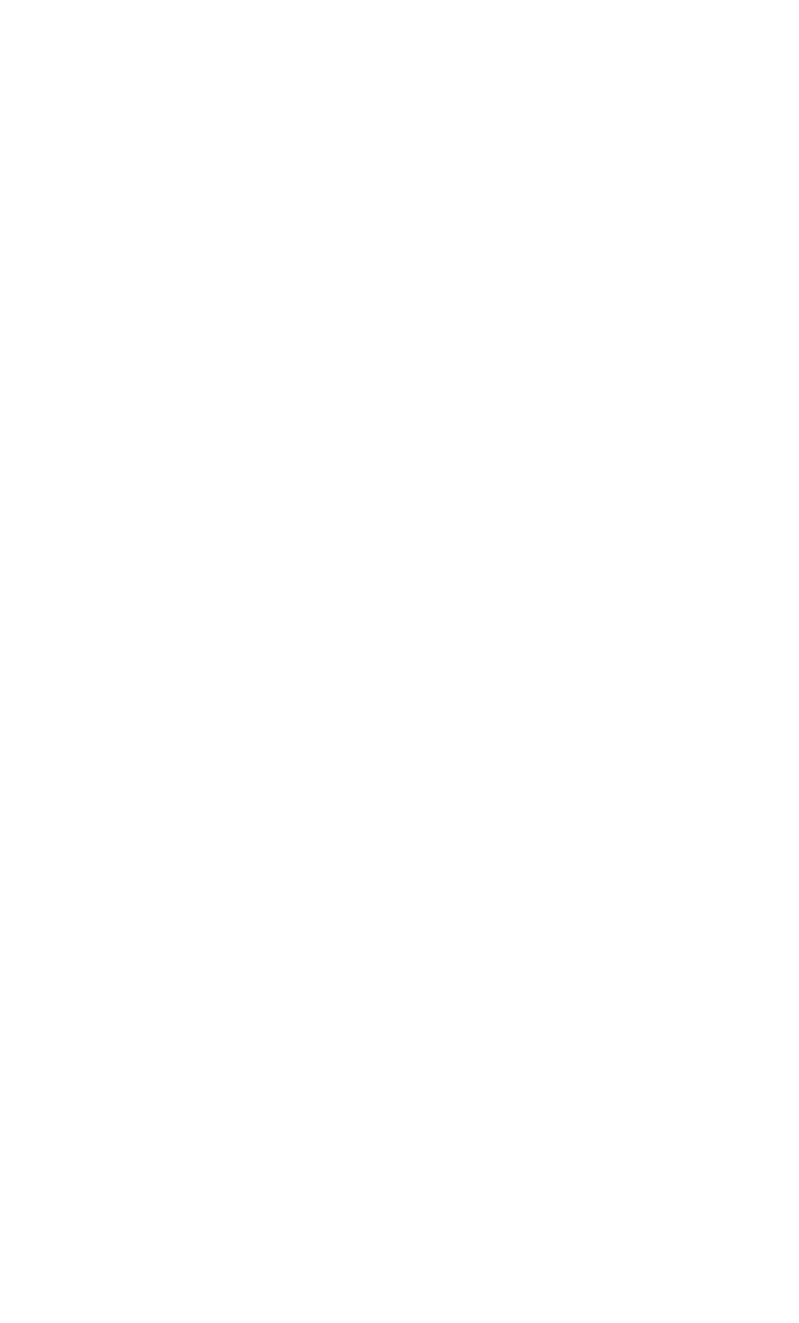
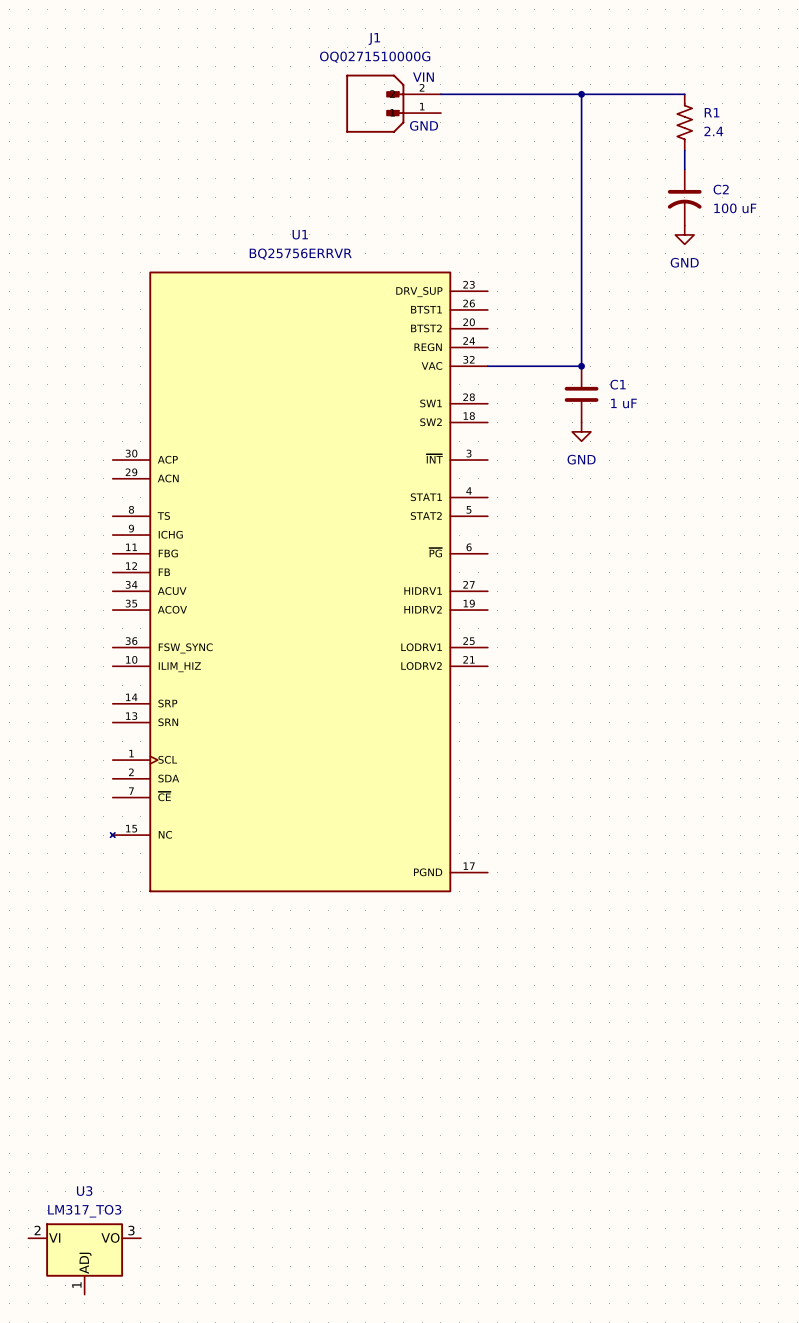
text: none -> VIN (423, 77)
wire: none -> (440, 94) (684, 94)
wire: none -> (581, 94) (581, 366) (487, 366)
junction: none -> (581, 94)
J1: none -> OQ0271510000G (393, 103)
R1: none -> 2.4 (684, 122)
text: none -> GND (424, 125)
wire: none -> (684, 150) (684, 169)
C2: none -> 100 uF (684, 197)
power symbol: none -> GND (684, 234)
junction: none -> (581, 366)
C1: none -> 1 uF (581, 394)
power symbol: none -> GND (581, 431)
U1: none -> BQ25756ERRVR (299, 581)
U3: none -> LM317_TO3 (84, 1258)

